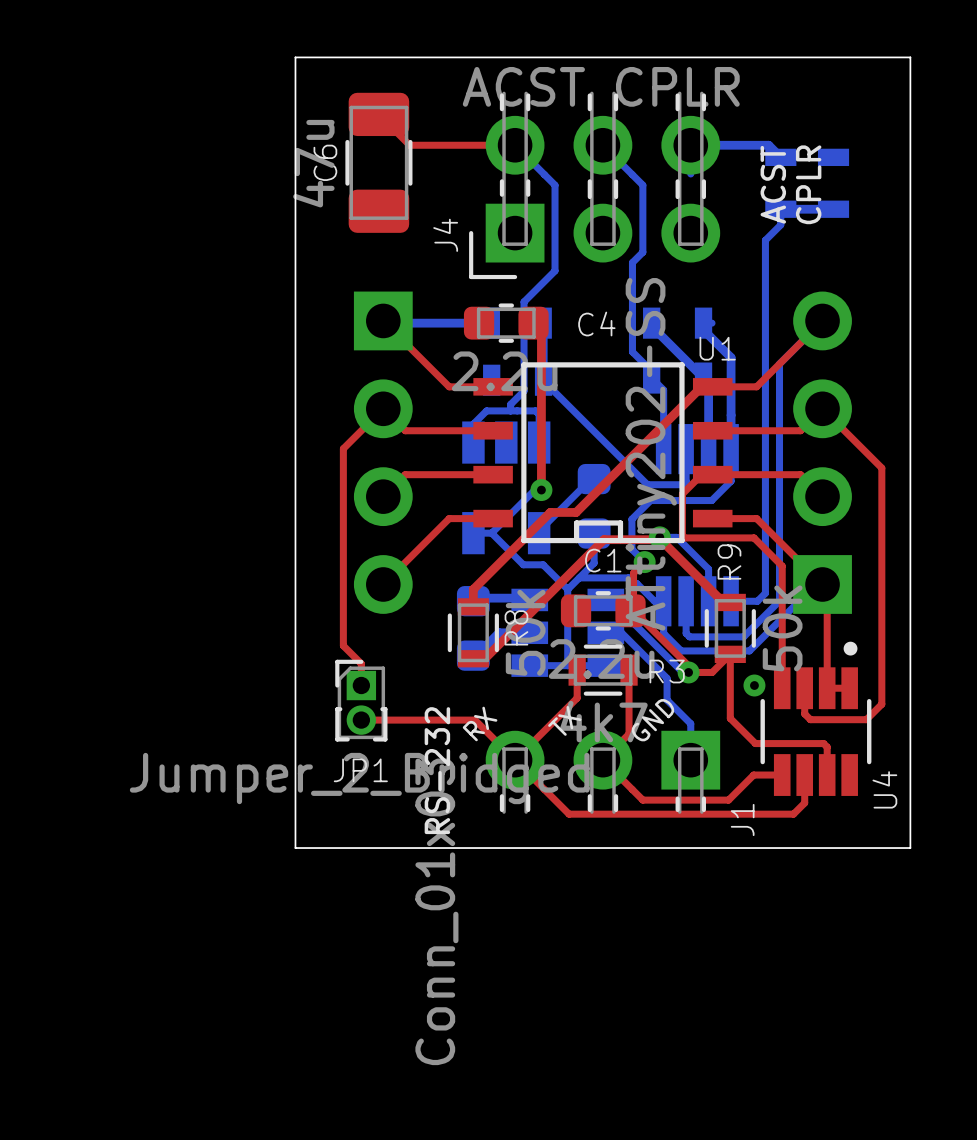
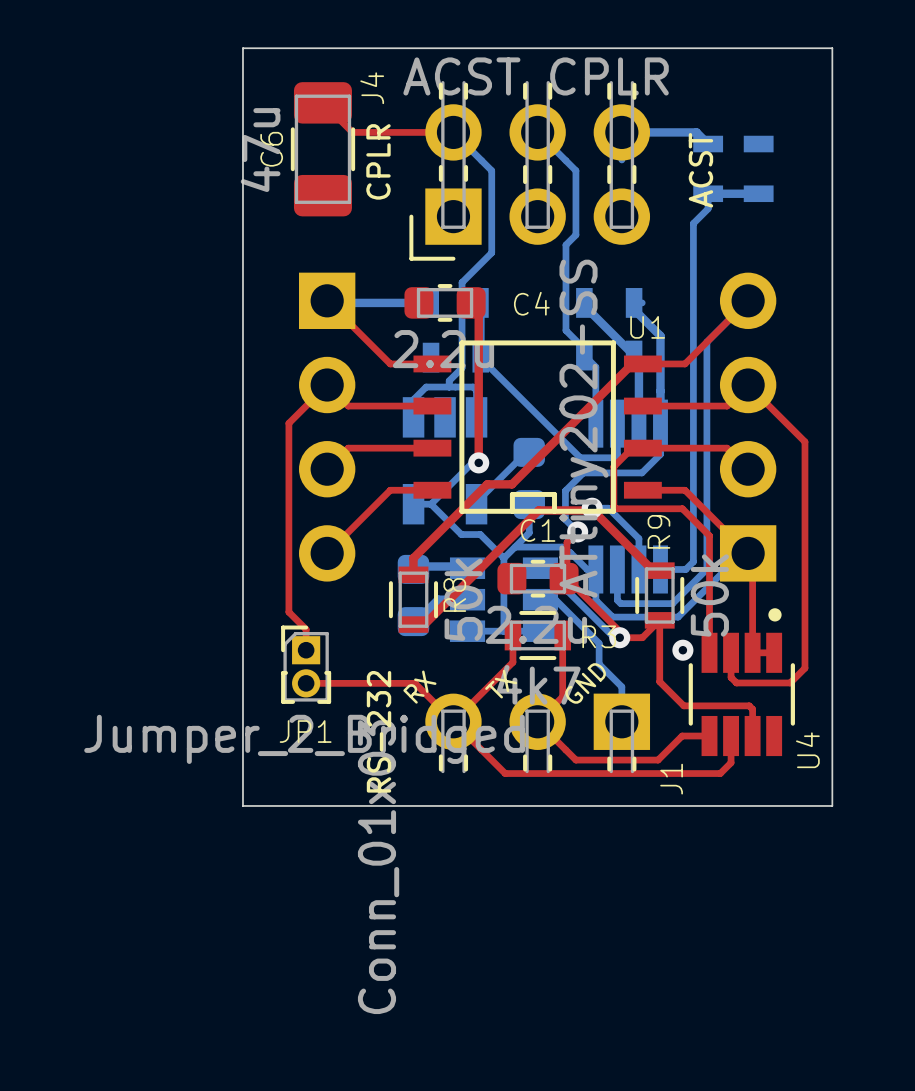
text position: CPLR (808, 184) -> CPLR (378, 161)
J4 name position: J4 (445, 235) -> J4 (372, 88)

